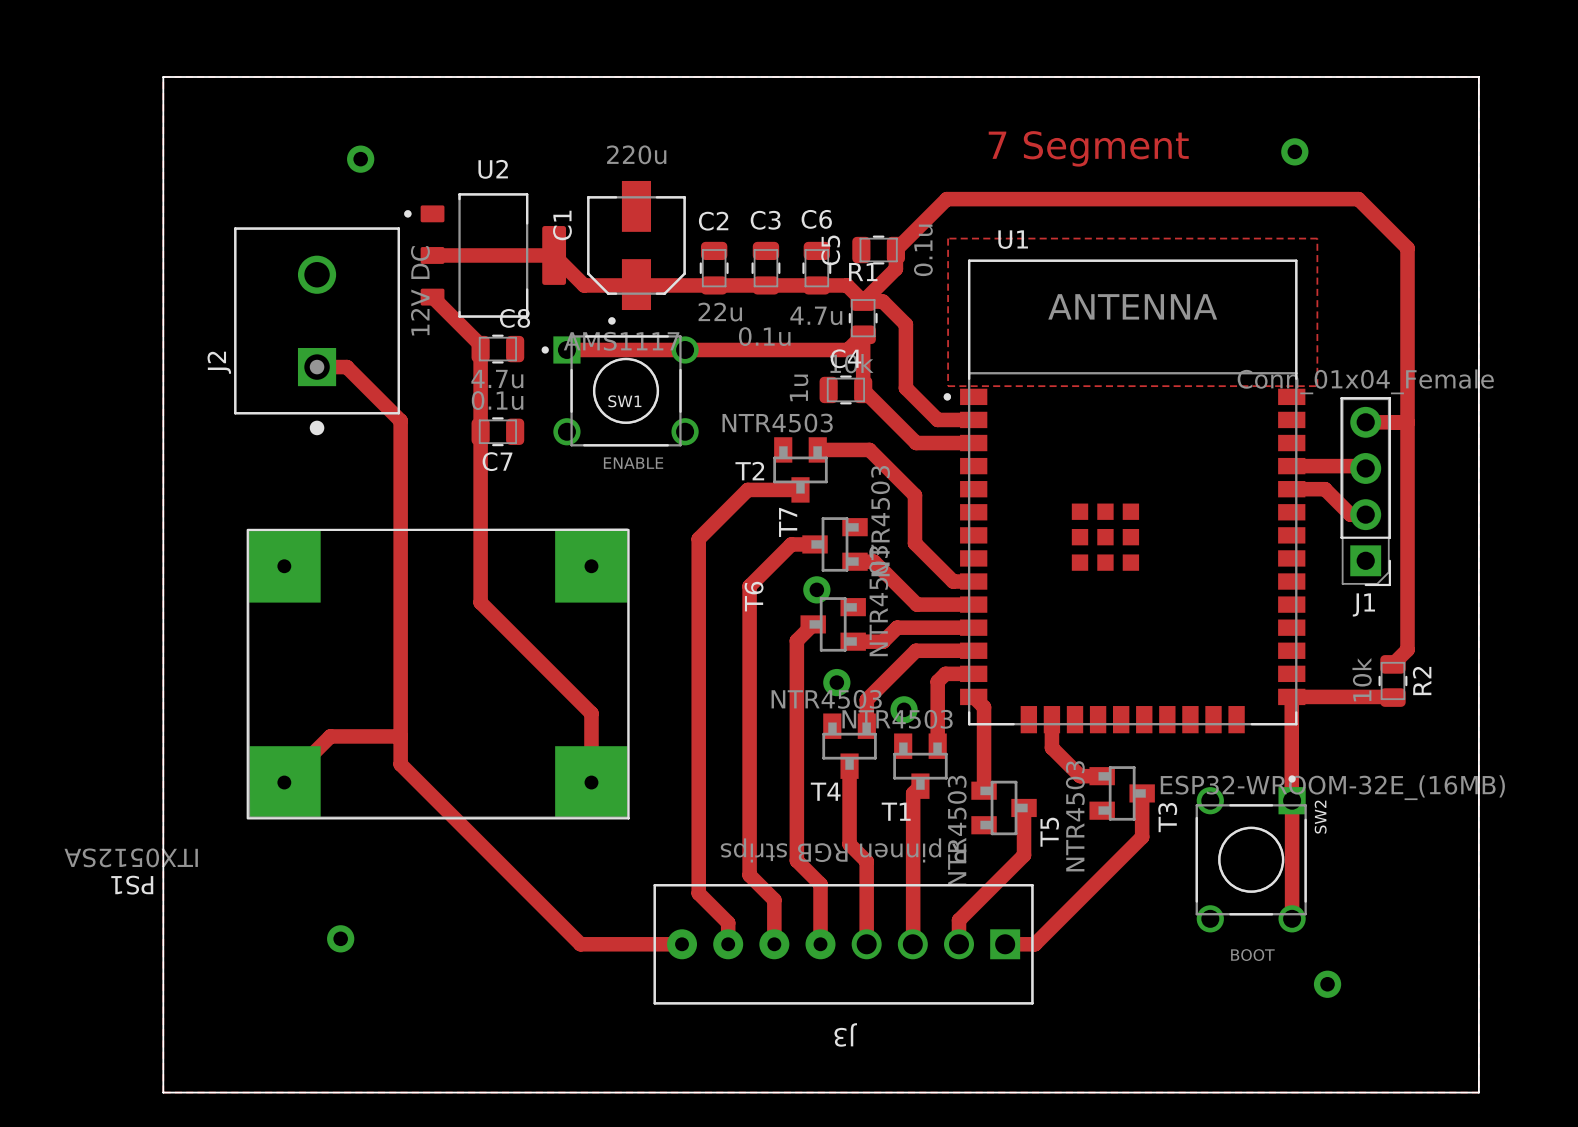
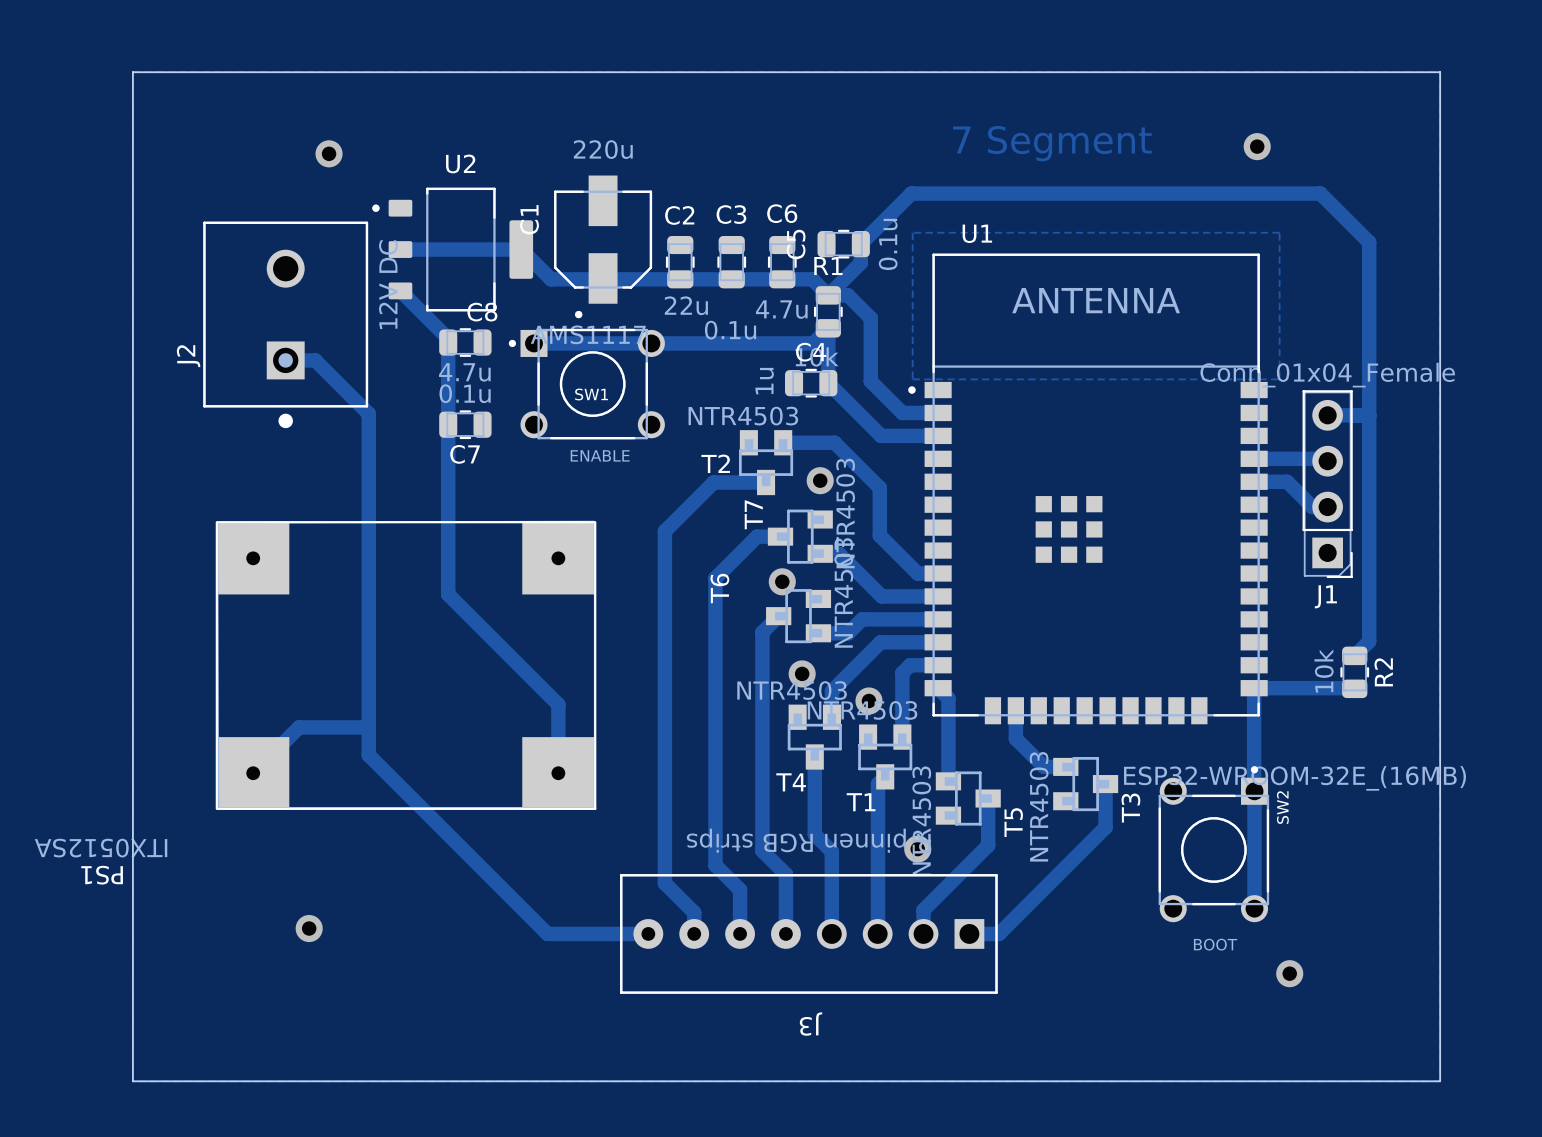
via: none -> (820, 480)
via: none -> (917, 849)

